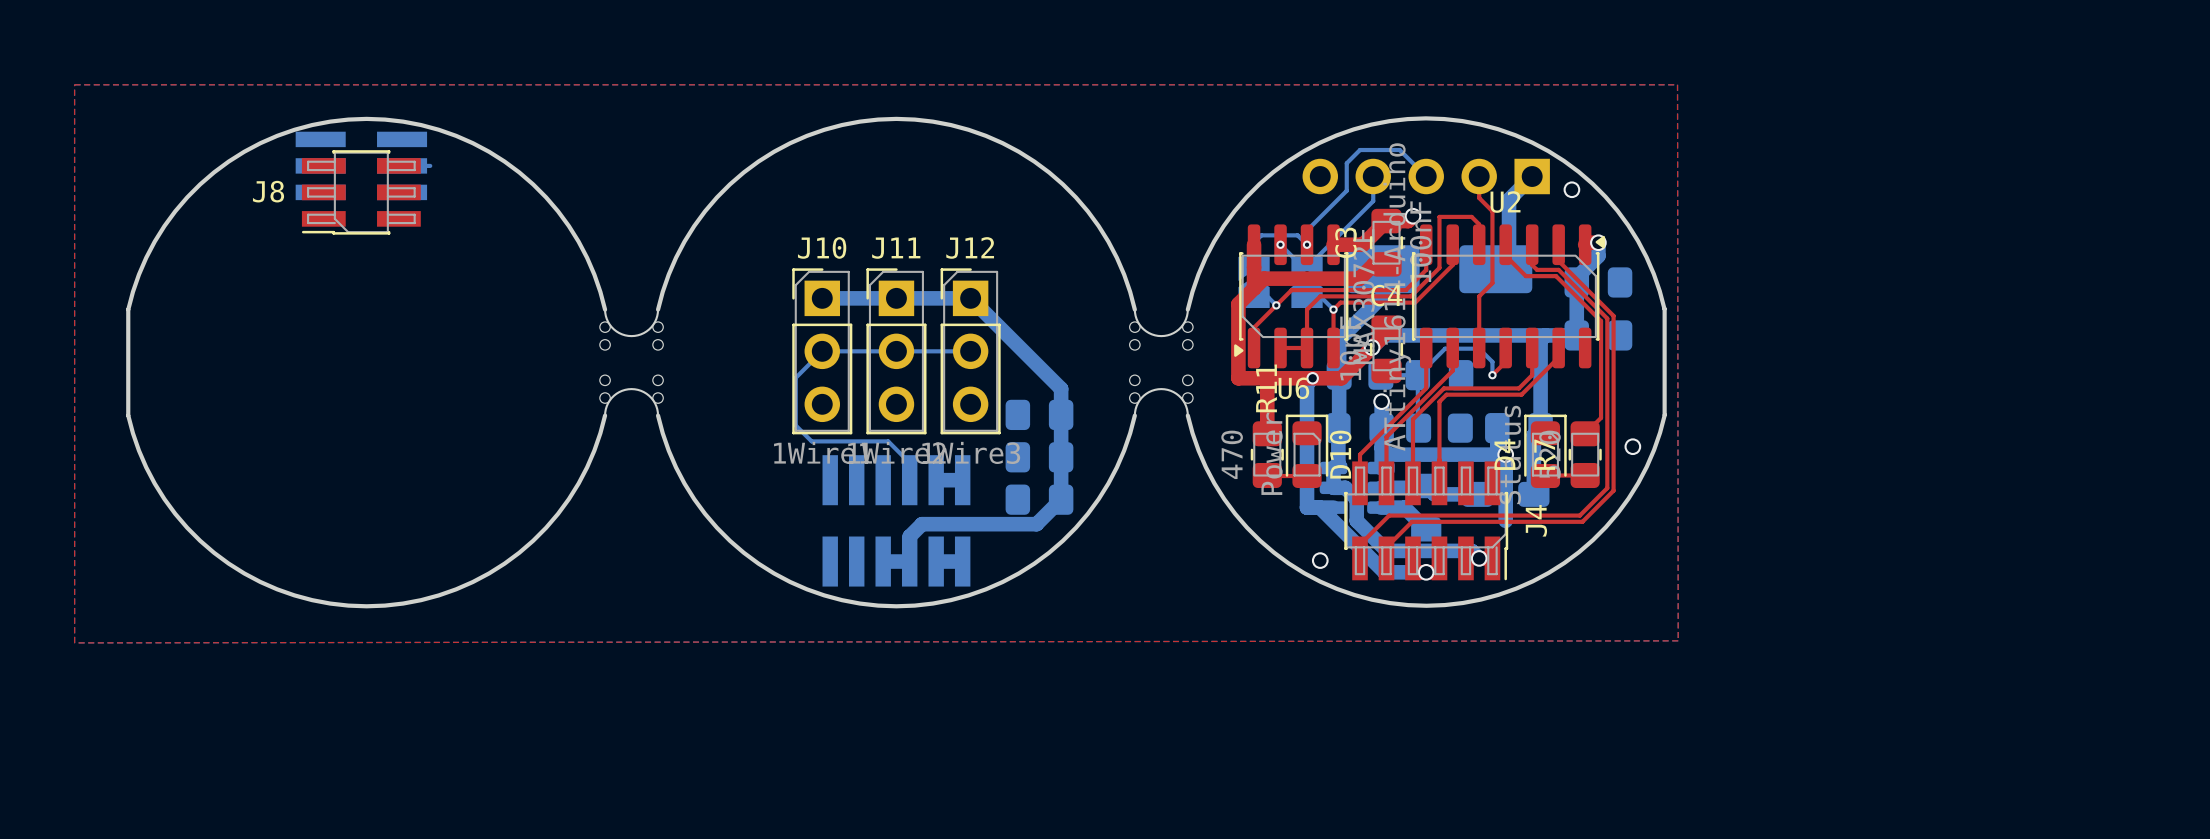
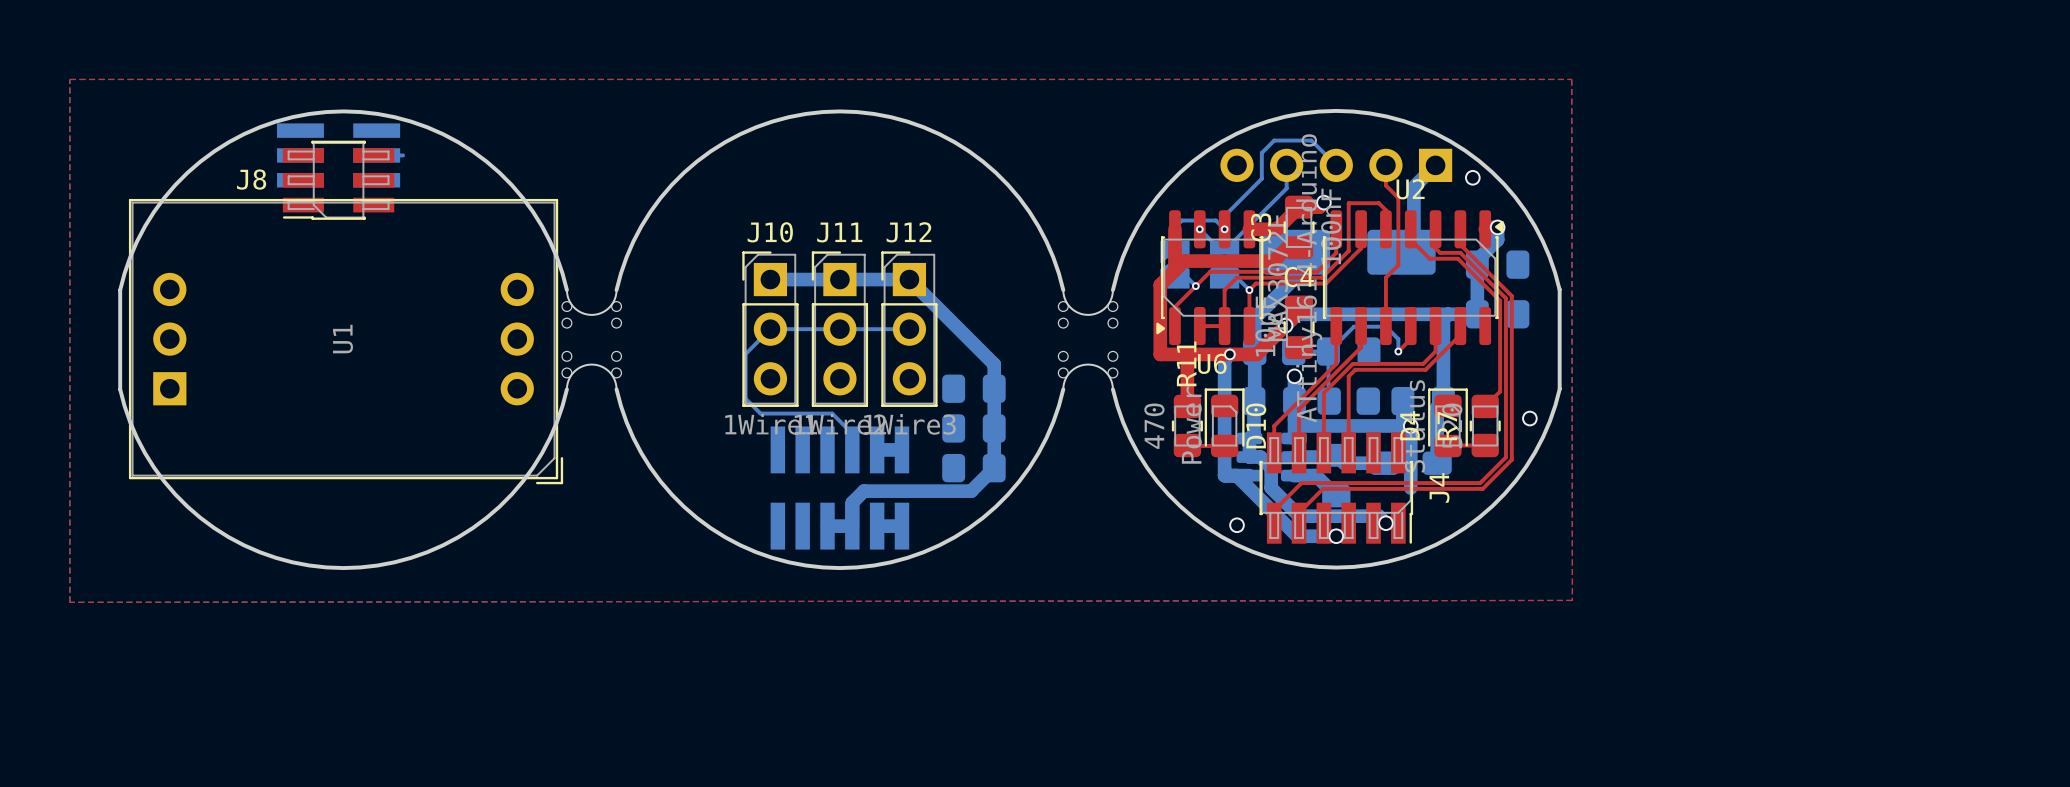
U1: none -> (346, 341)

